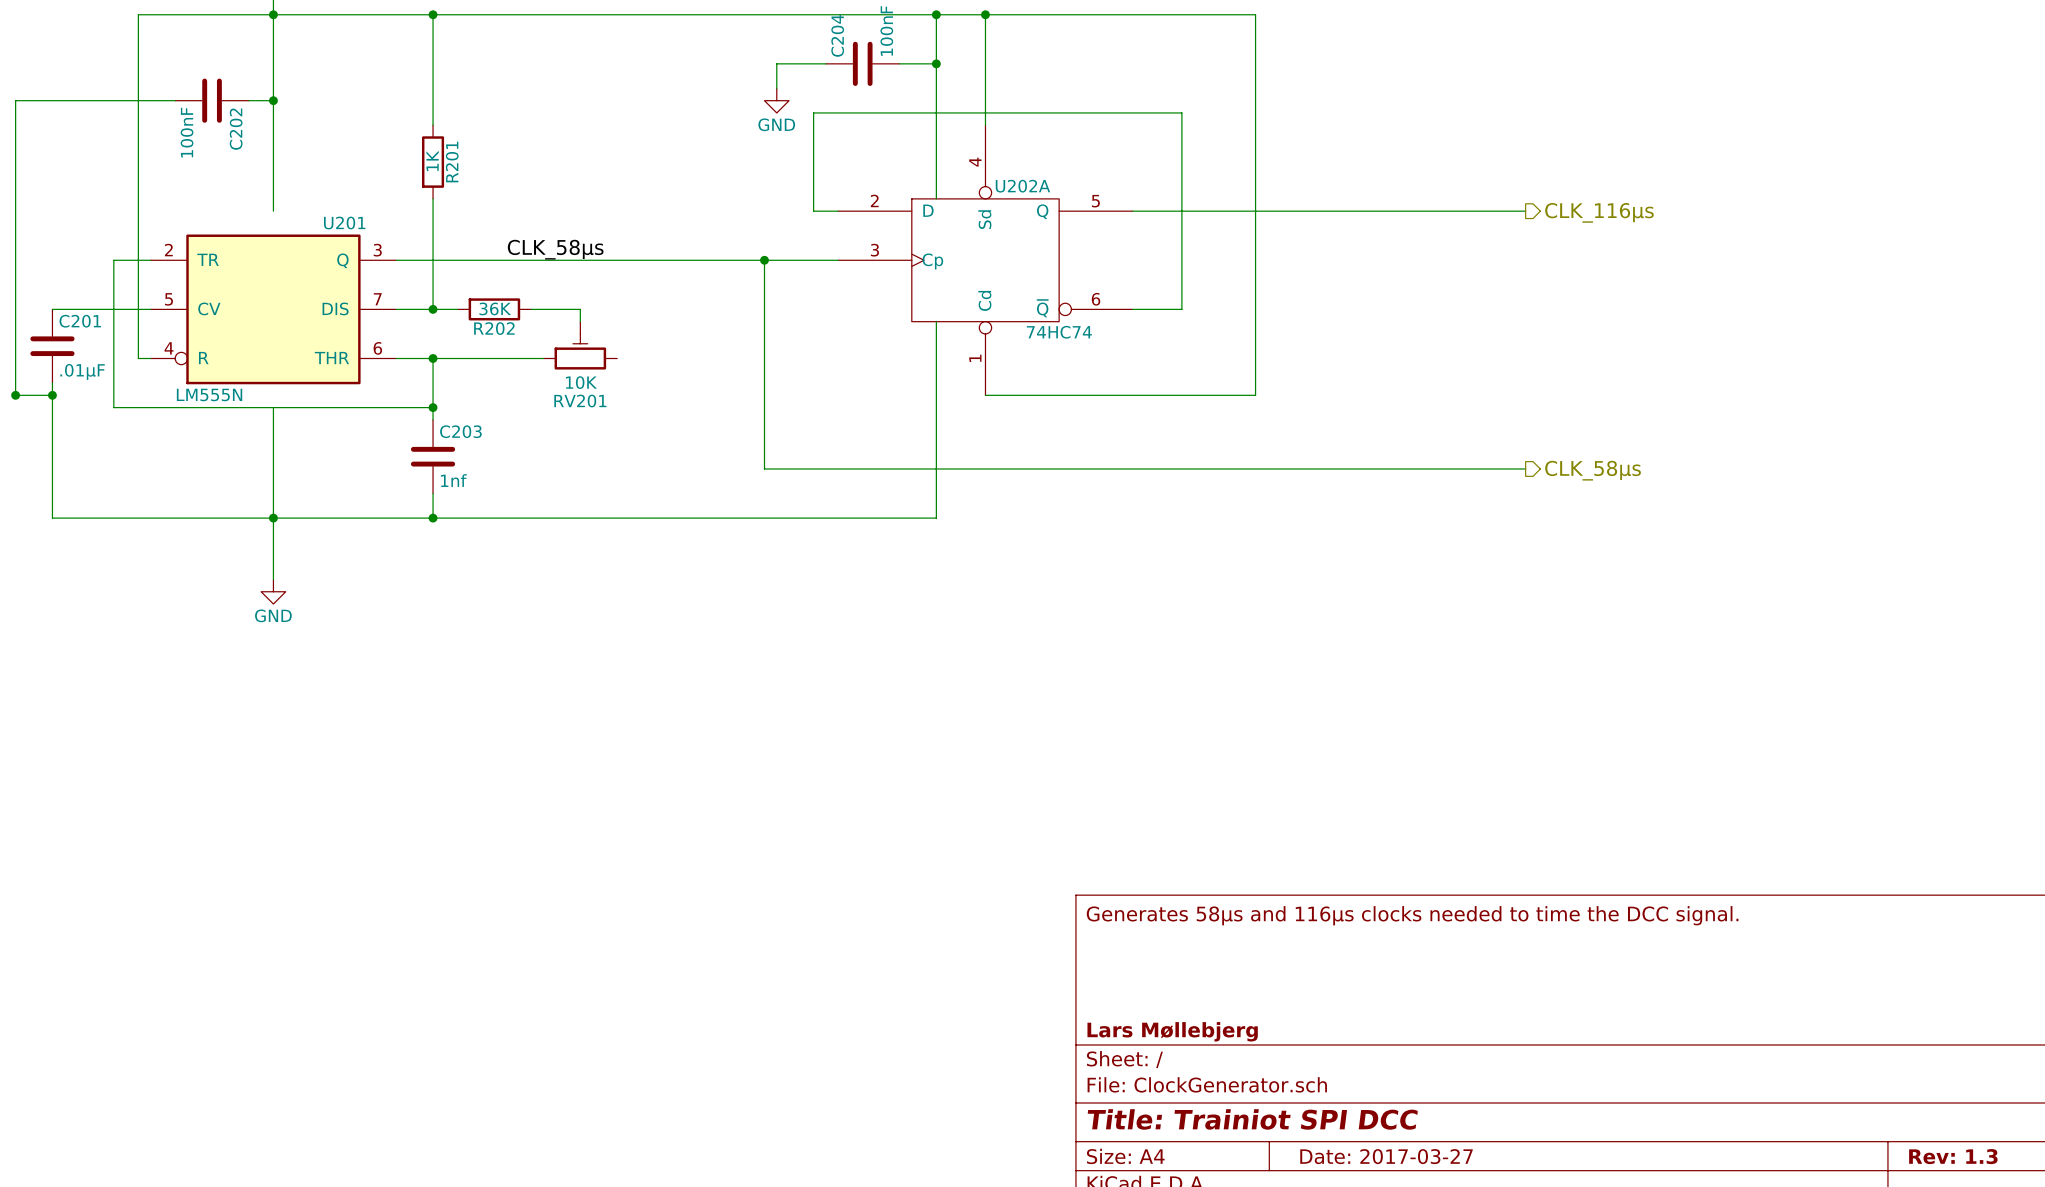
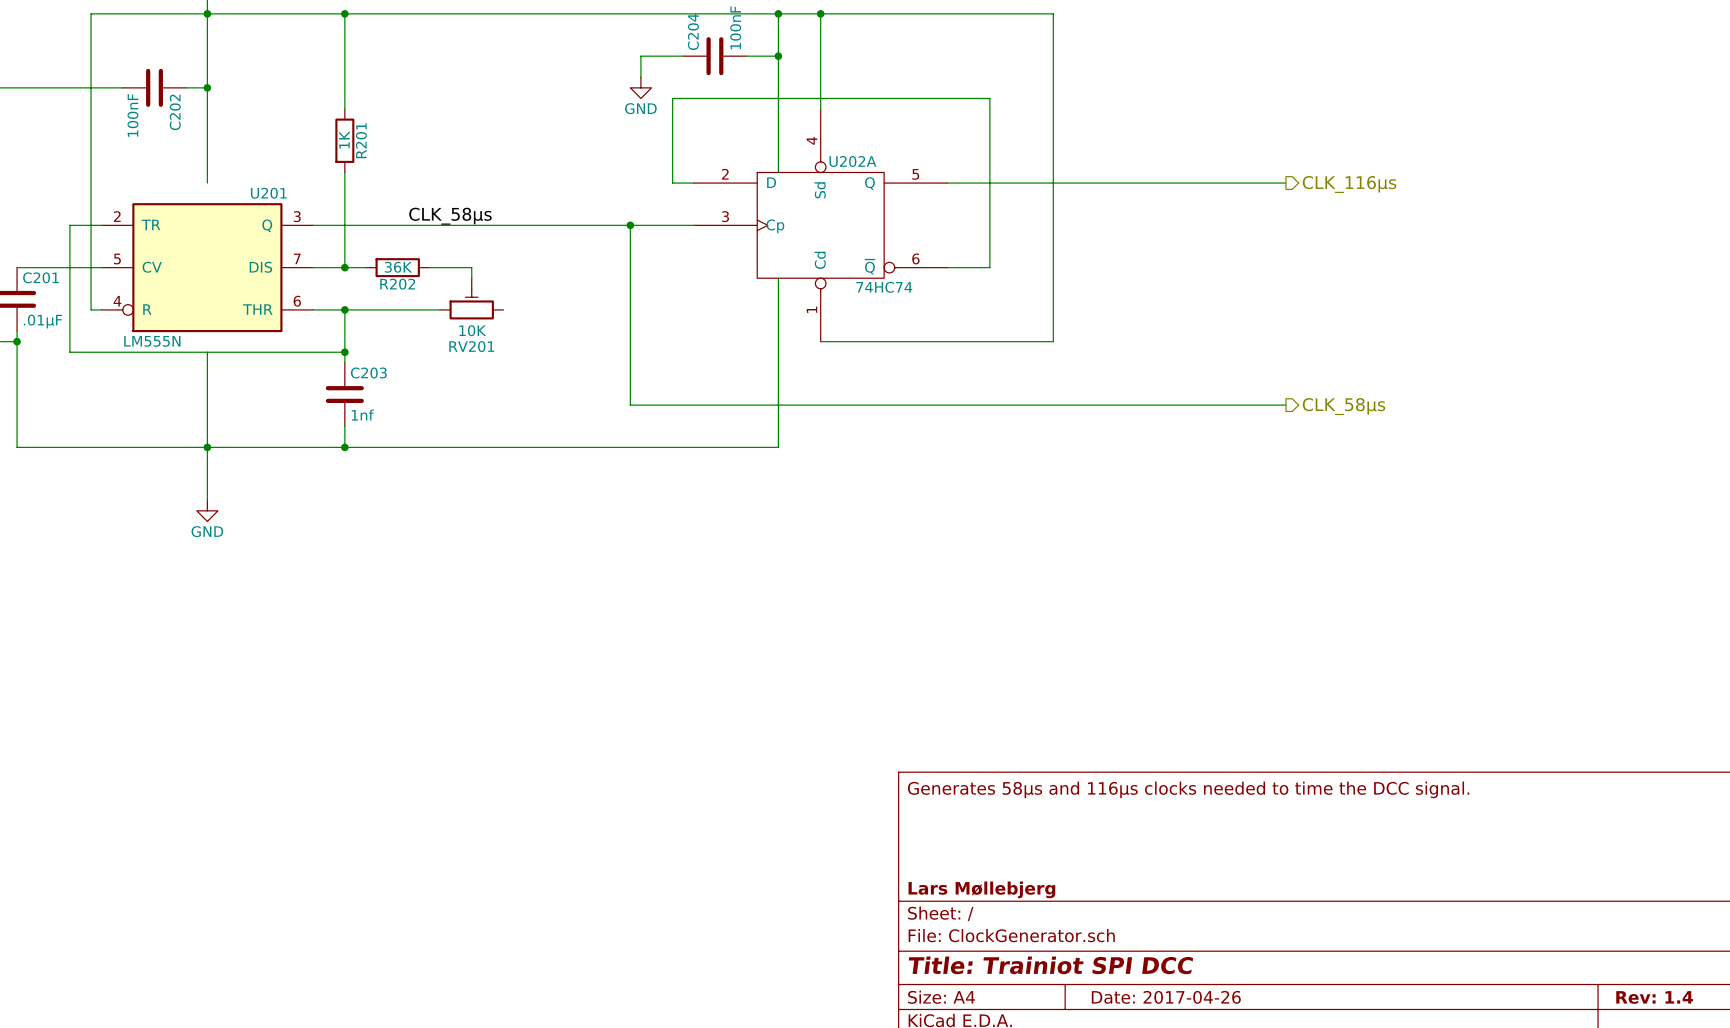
title block: Date: 2017-03-27 (1386, 1156) -> Date: 2017-04-26 (1166, 997)
title block: Rev: 1.3 (1953, 1156) -> Rev: 1.4 (1654, 997)

